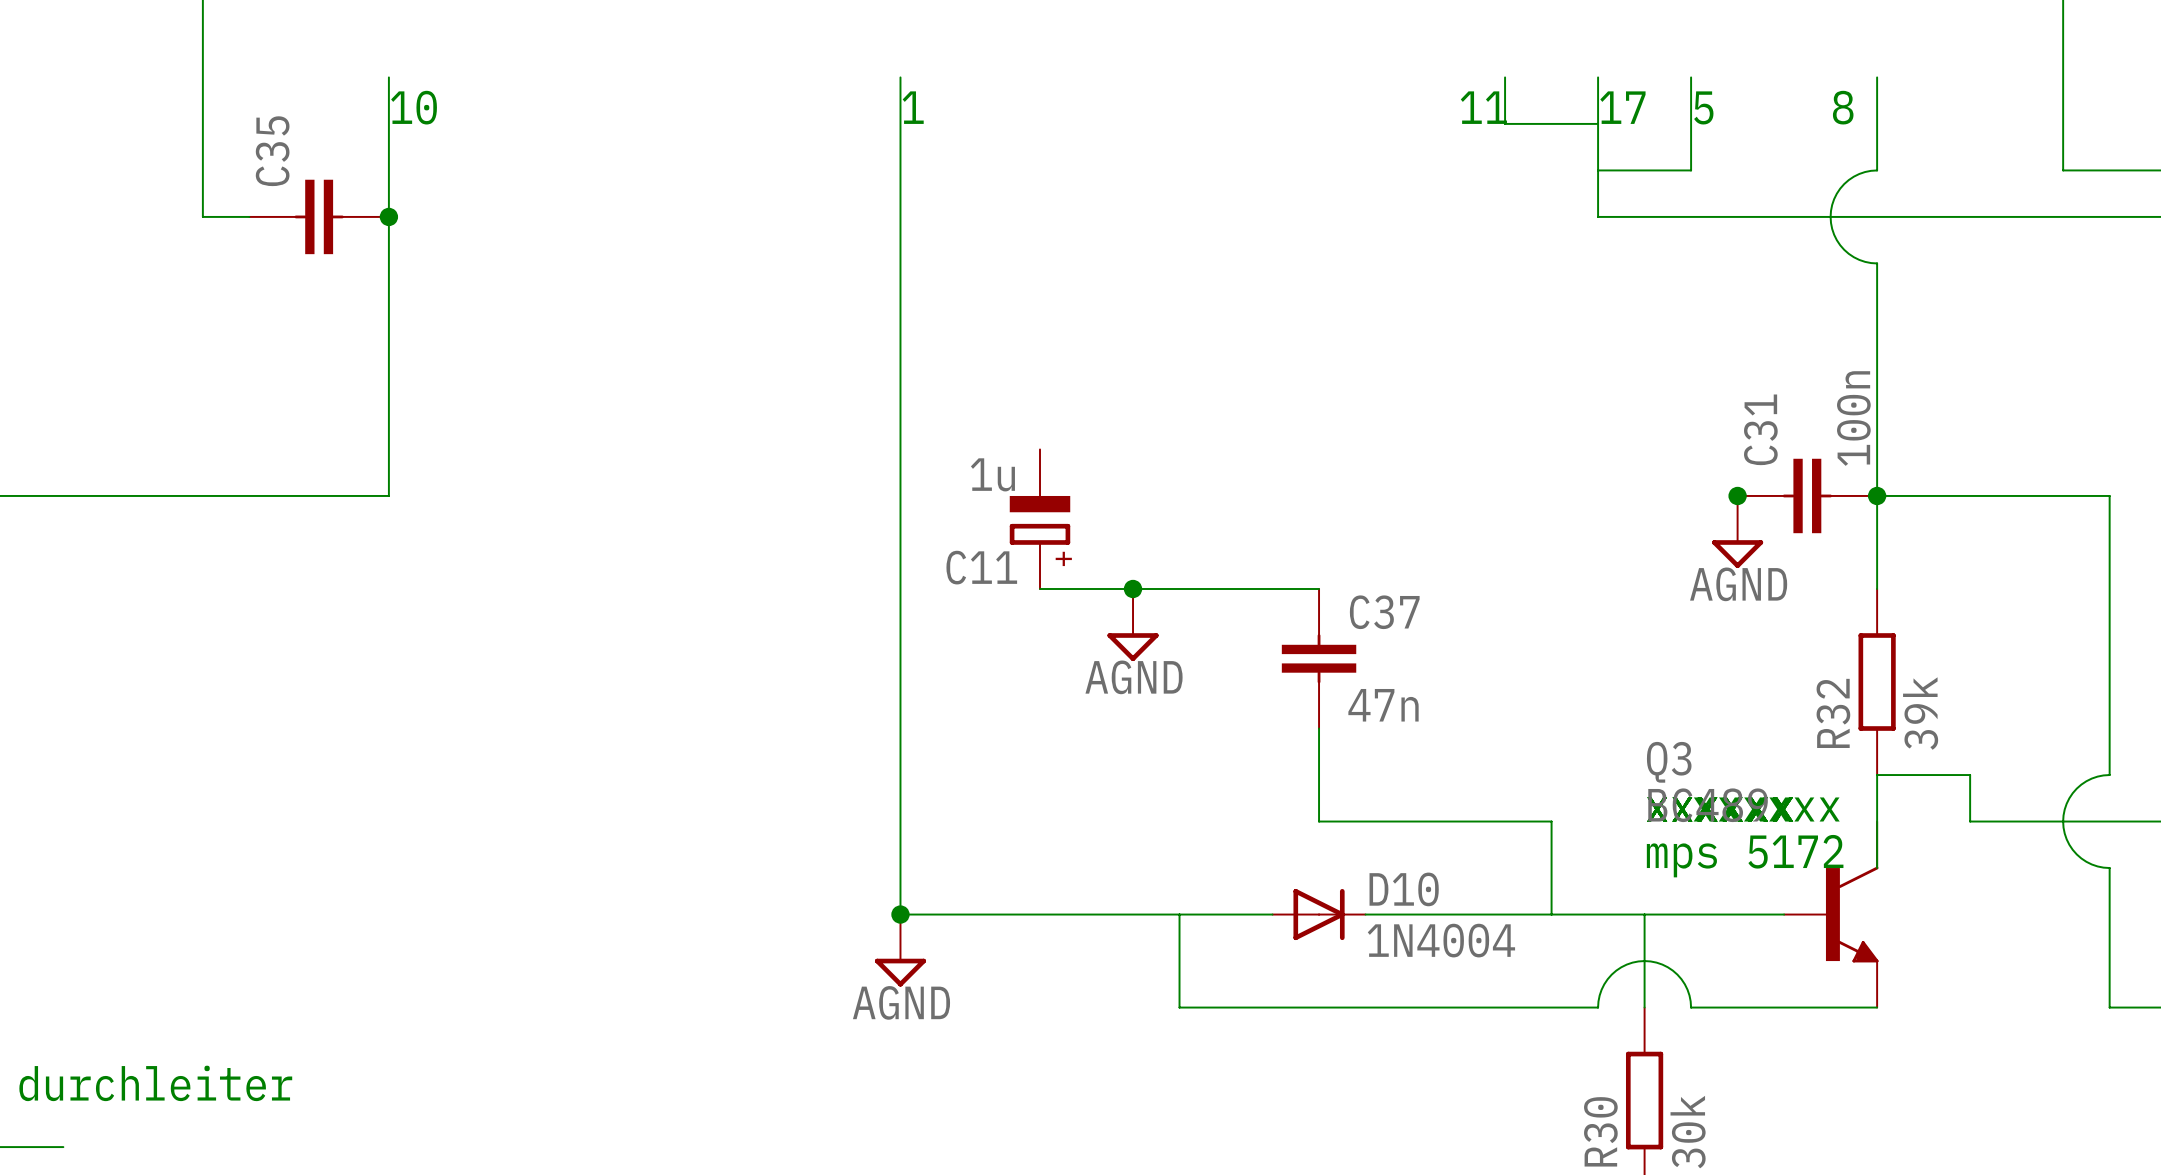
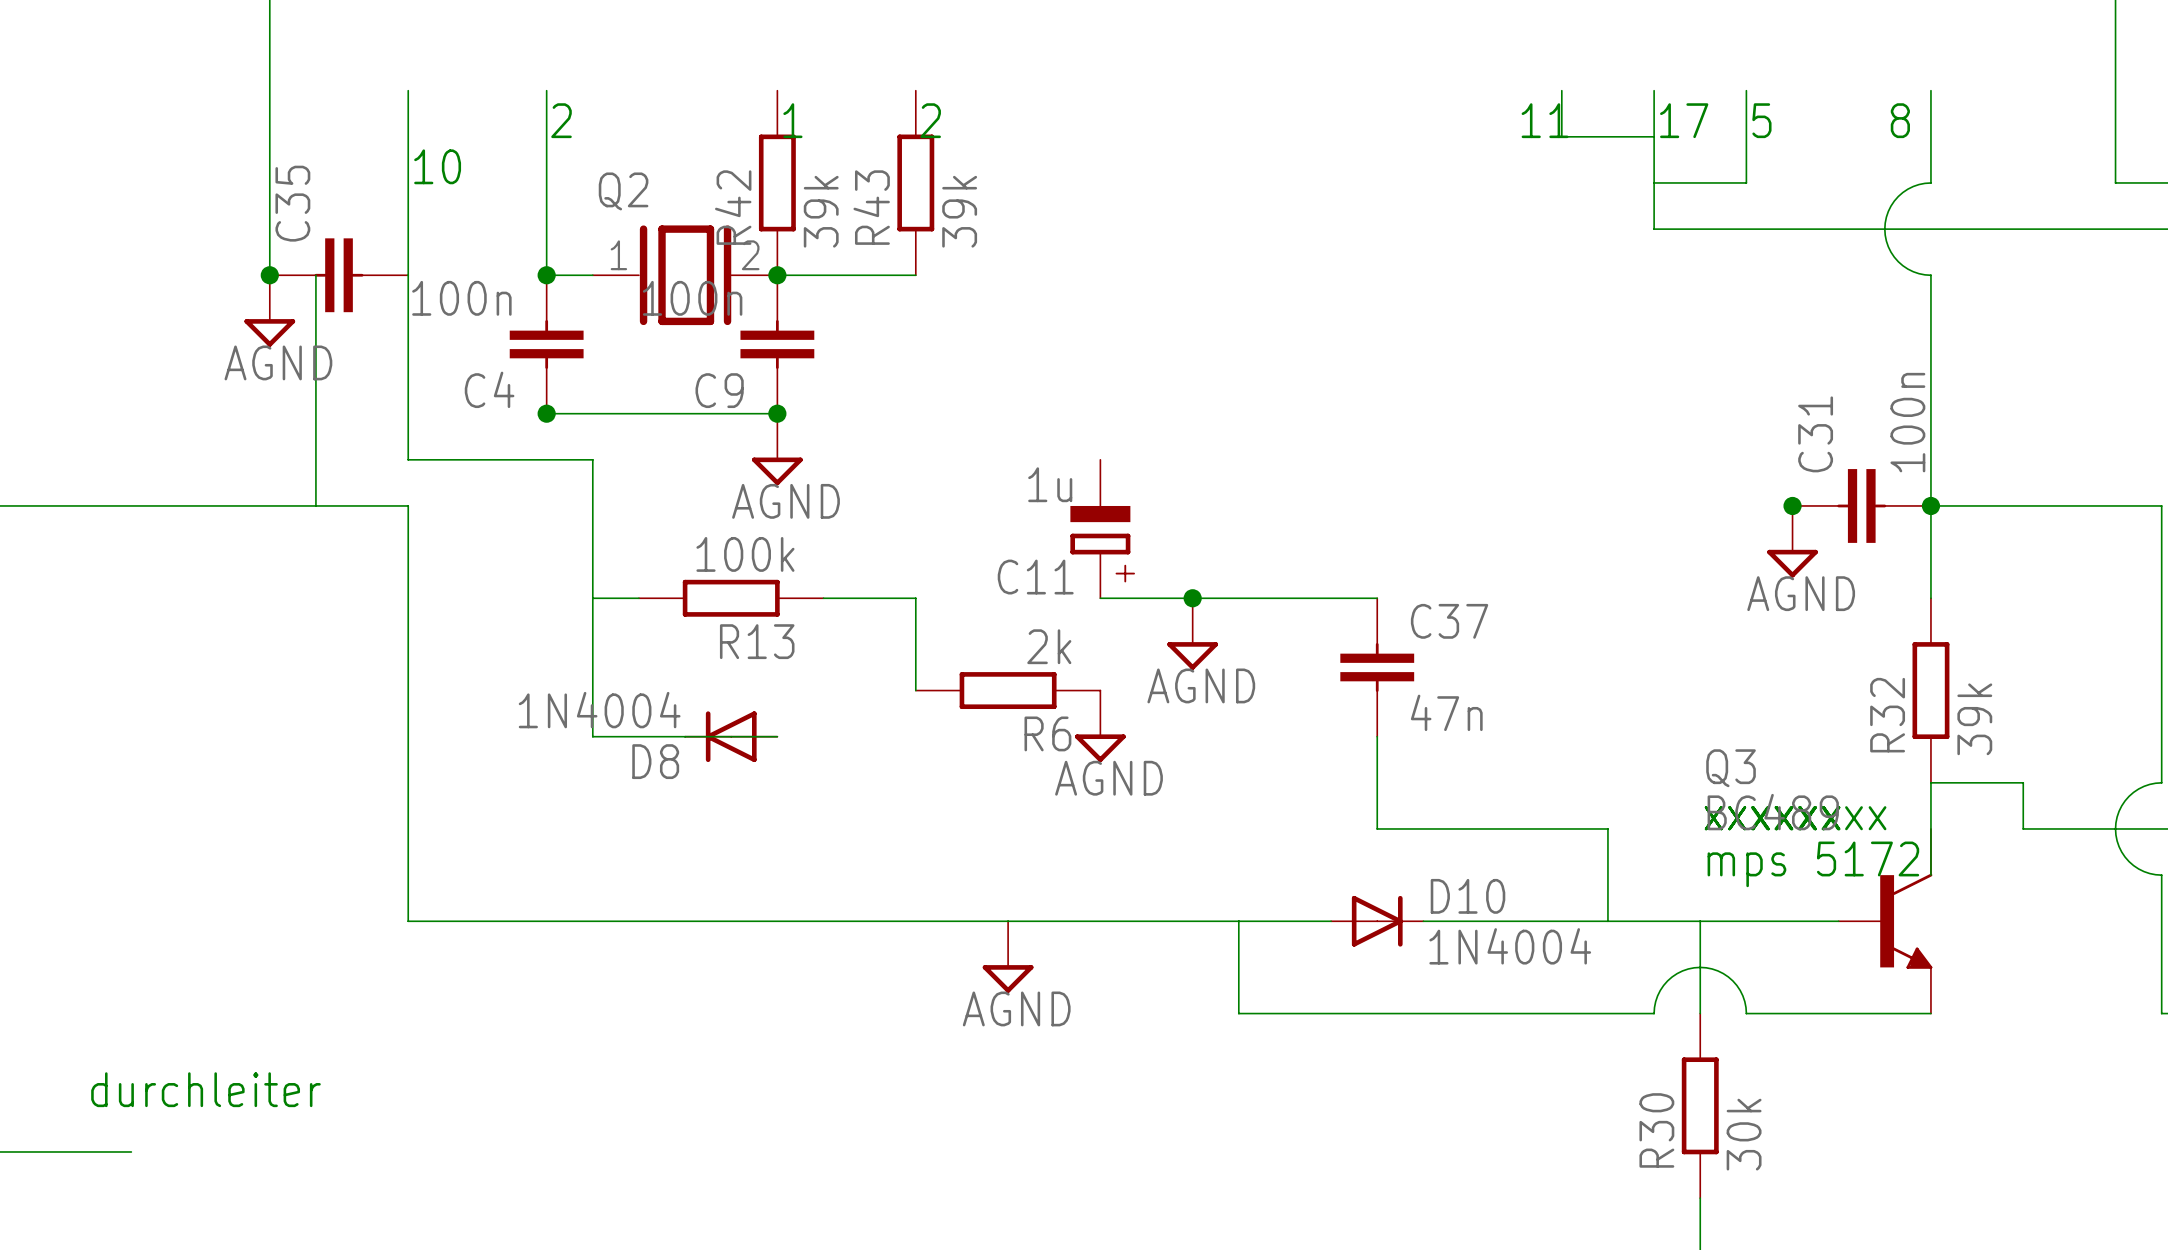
wire: none -> (408, 90) (408, 459) (592, 459) (592, 736) (777, 736)
wire: (388, 77) (388, 495) (342, 495) -> none
wire: none -> (546, 90) (546, 275) (592, 275)
wire: (900, 77) (900, 914) -> (408, 505) (408, 921) (961, 921)
text position: 10 (414, 107) -> 10 (437, 166)
text: none -> 2 (561, 120)
text: none -> 2 (930, 120)
text position: 1 (913, 107) -> 1 (792, 120)
R42: none -> 39k (777, 182)
R43: none -> 39k (915, 182)
wire: (202, 216) (249, 216) -> (269, 229) (269, 275)
C35 position: (319, 216) -> (339, 275)
junction: (388, 216) -> none
junction: none -> (269, 275)
wire: none -> (315, 275) (315, 505)
junction: none -> (546, 275)
Q2: none -> (685, 275)
wire: none -> (777, 275) (915, 275)
junction: none -> (777, 275)
power symbol: none -> AGND (269, 311)
C4: none -> 100n (546, 344)
C9: none -> 100n (777, 344)
wire: none -> (546, 413) (777, 413)
junction: none -> (546, 413)
junction: none -> (777, 413)
power symbol: none -> AGND (777, 449)
wire: none -> (592, 598) (638, 598)
R13: none -> 100k (731, 598)
wire: none -> (823, 598) (915, 598) (915, 690)
R6: none -> 2k (1008, 690)
power symbol: none -> AGND (1100, 726)
D8: none -> 1N4004 (731, 736)
junction: (900, 914) -> none
power symbol position: AGND (900, 950) -> AGND (1008, 957)

